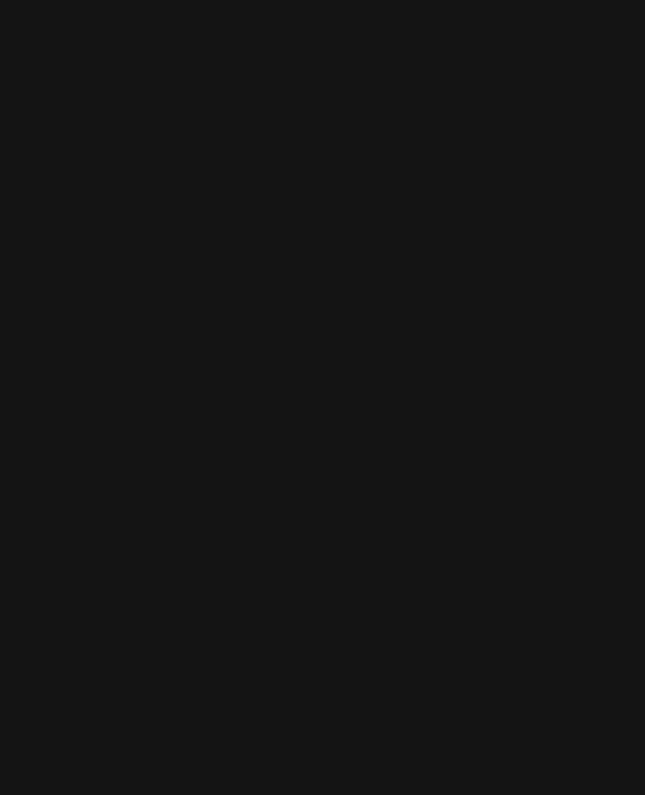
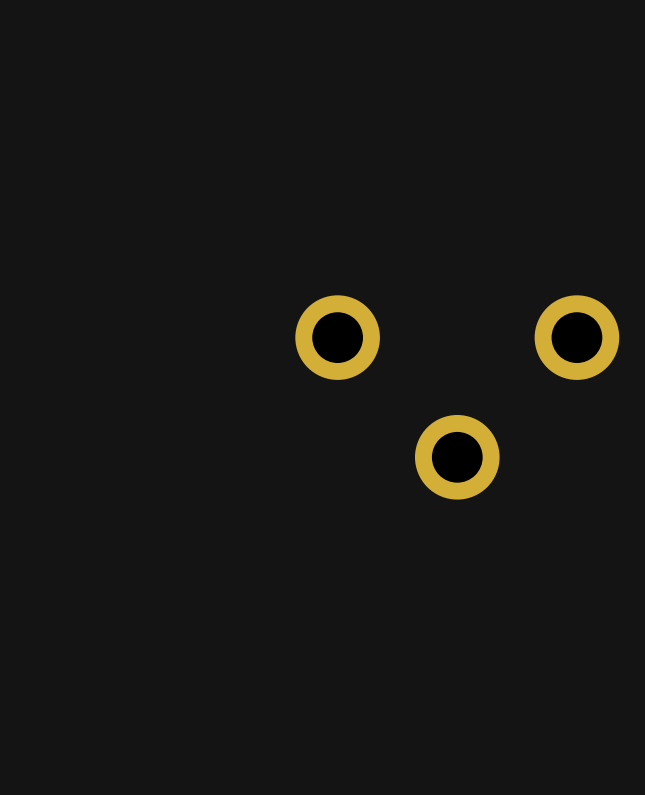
part: none -> (457, 397)

